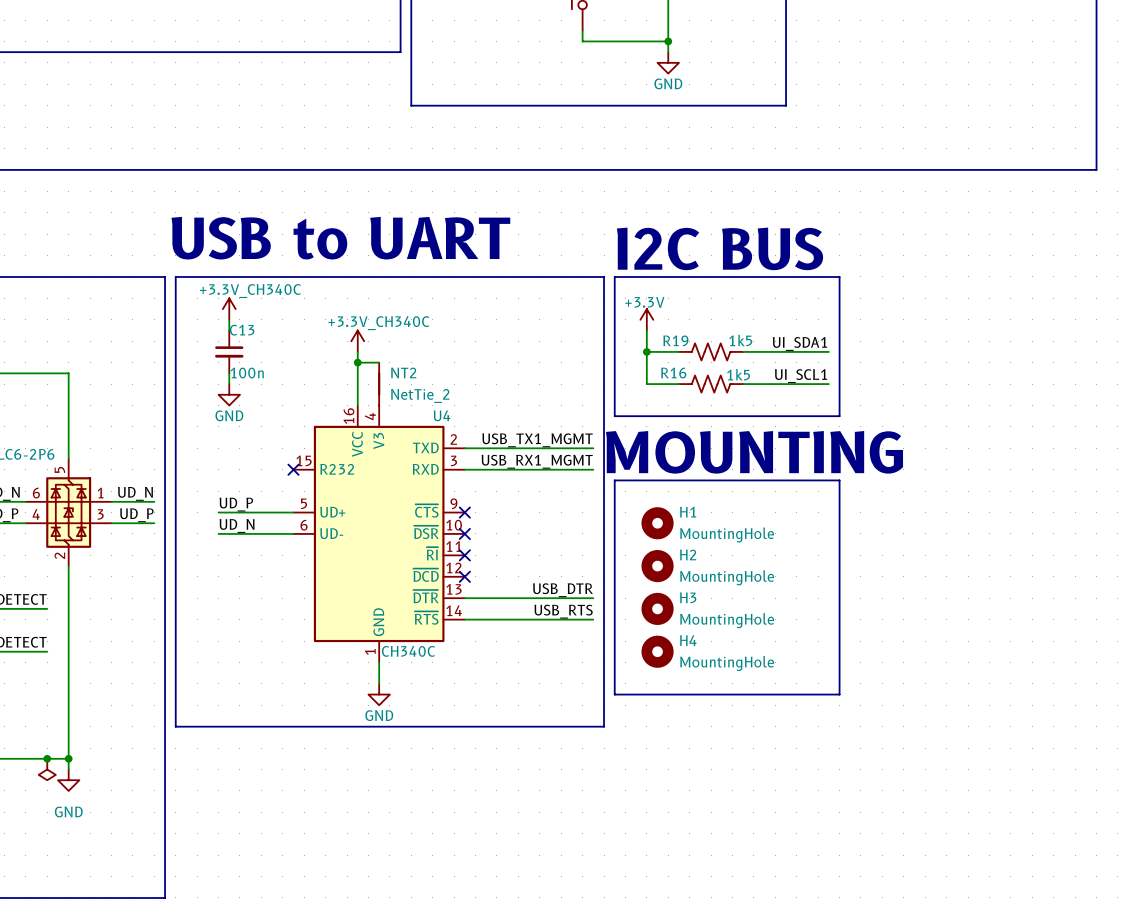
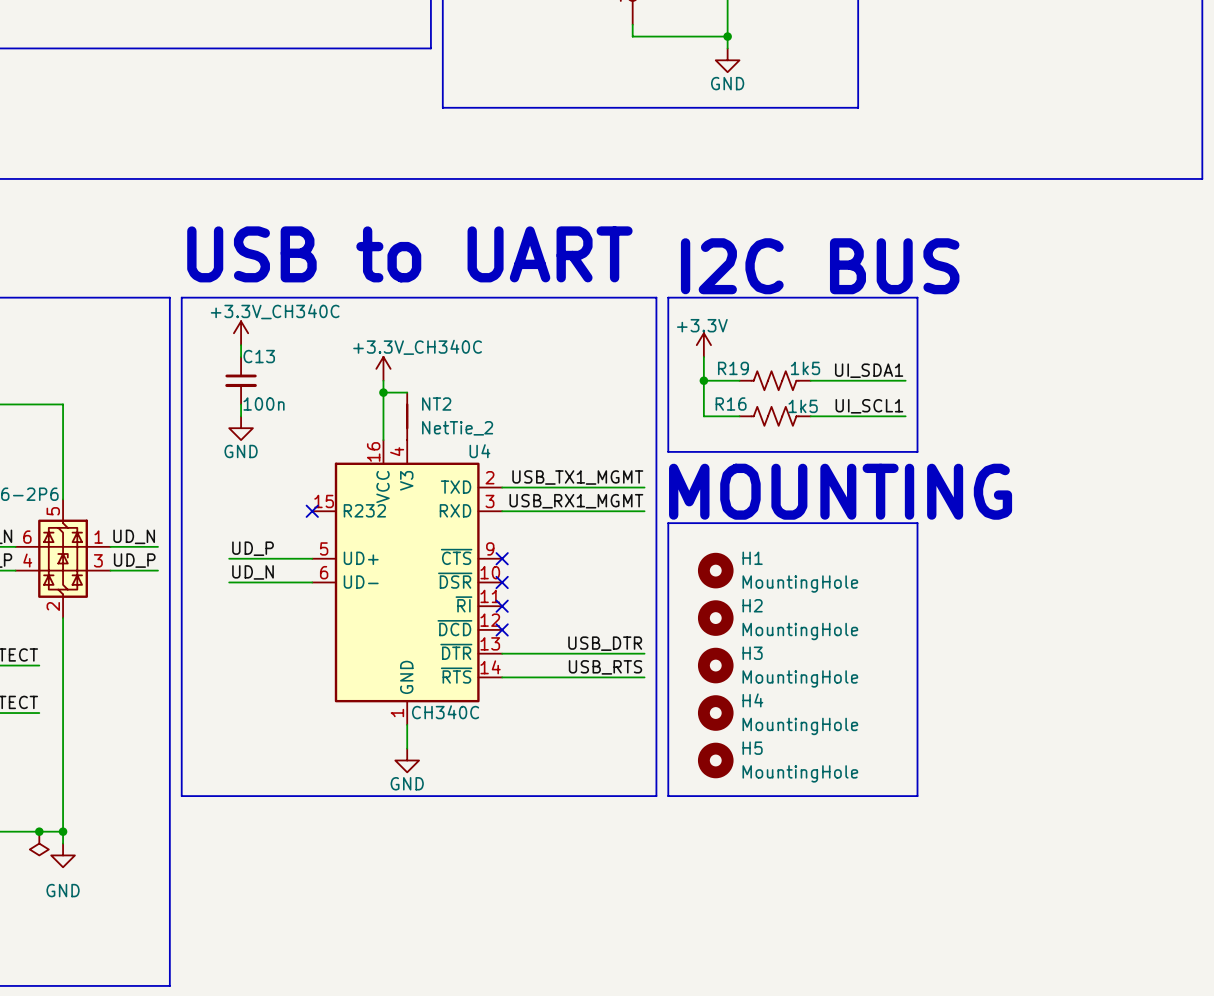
line: (614, 694) (839, 694) -> (668, 760) (668, 796) (917, 796) (917, 760)
H5: none -> MountingHole (715, 760)

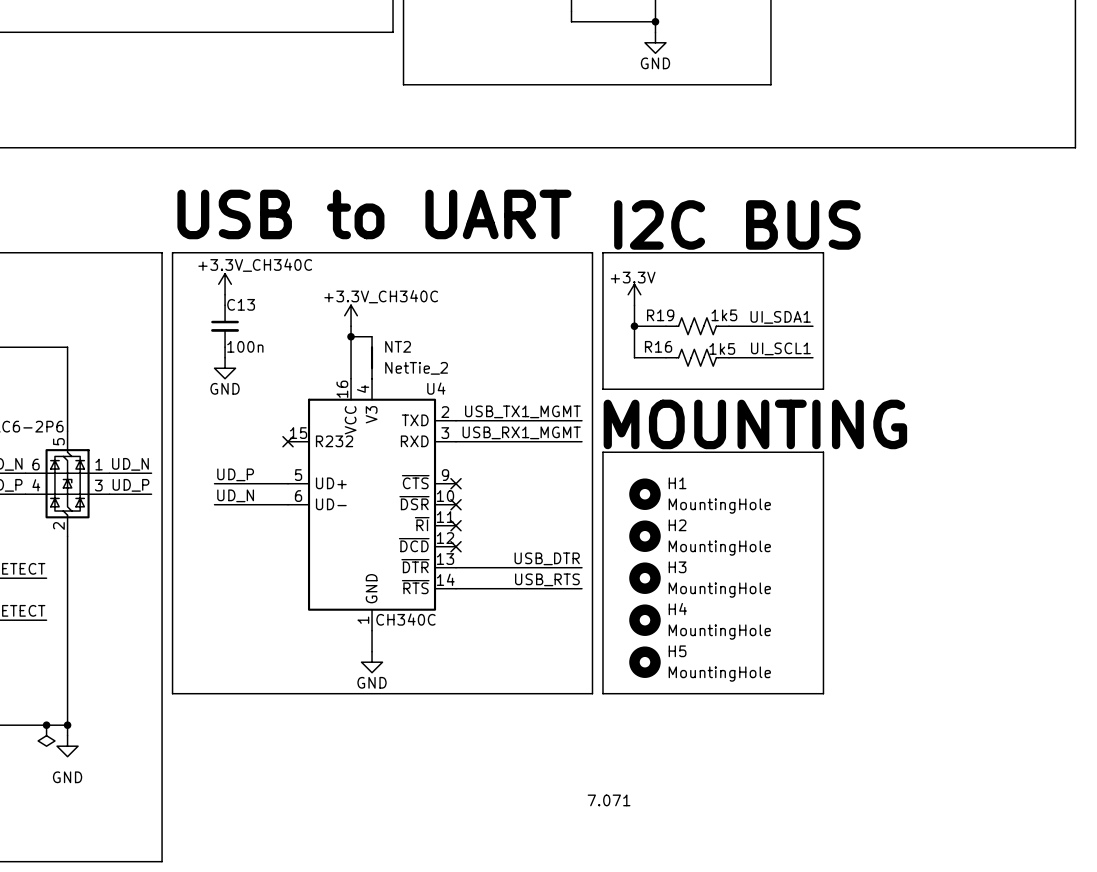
text: none -> 7.071 (609, 800)

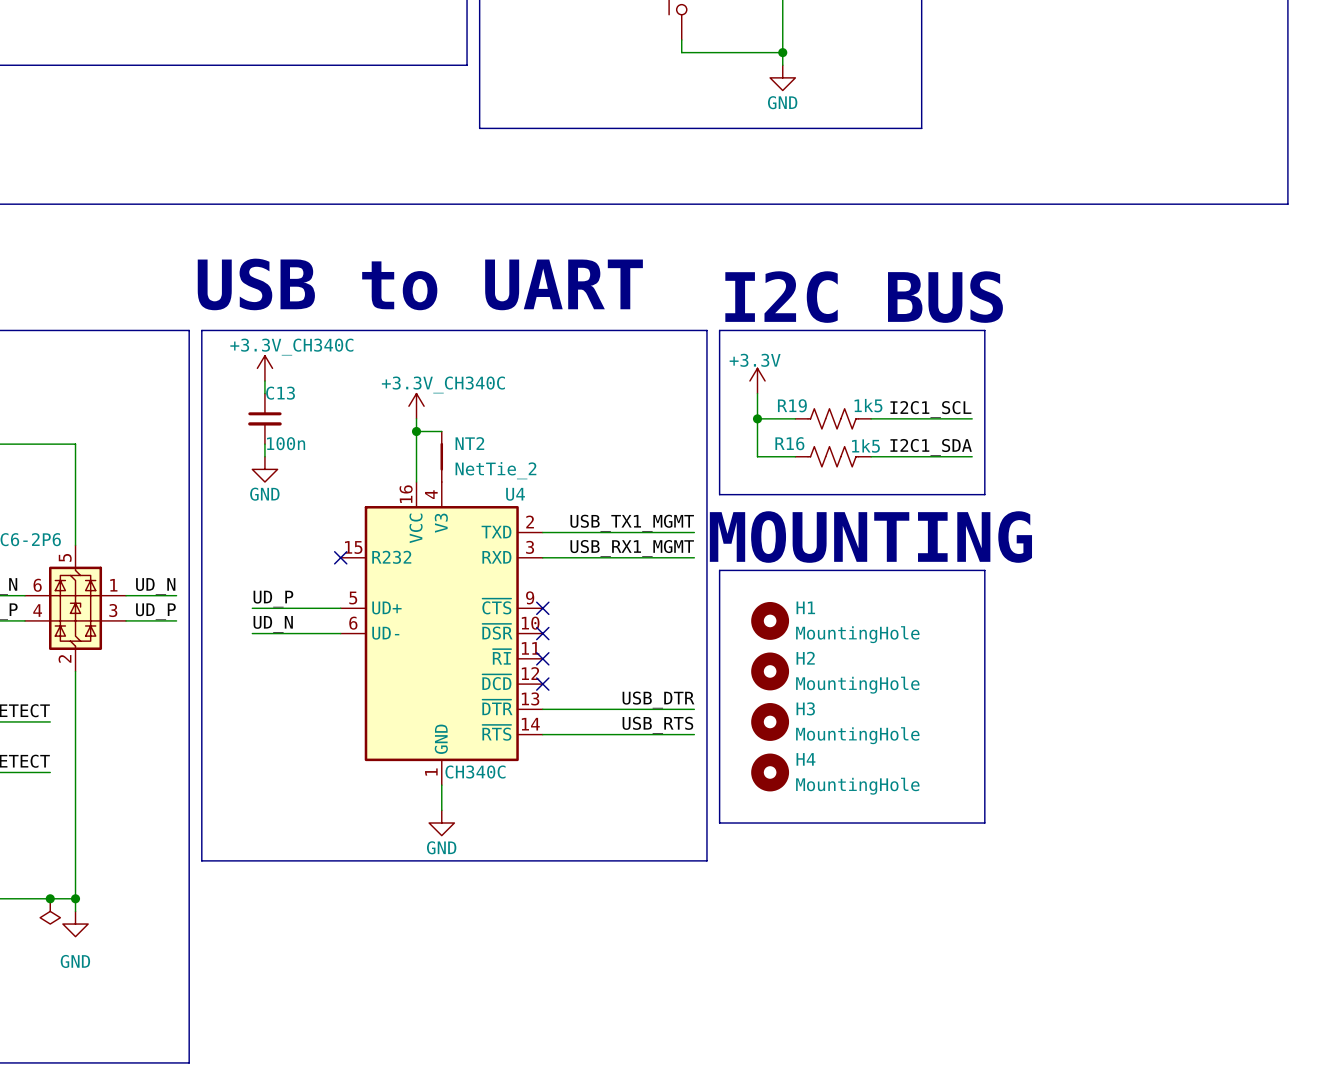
label: UI_SDA1 (780, 317) -> I2C1_SCL (930, 409)
label: UI_SCL1 (780, 348) -> I2C1_SDA (931, 447)
line: (602, 662) (602, 693) (823, 693) (823, 662) -> (719, 823) (984, 823)
H5: MountingHole (644, 662) -> none
text: 7.071 (609, 800) -> none

